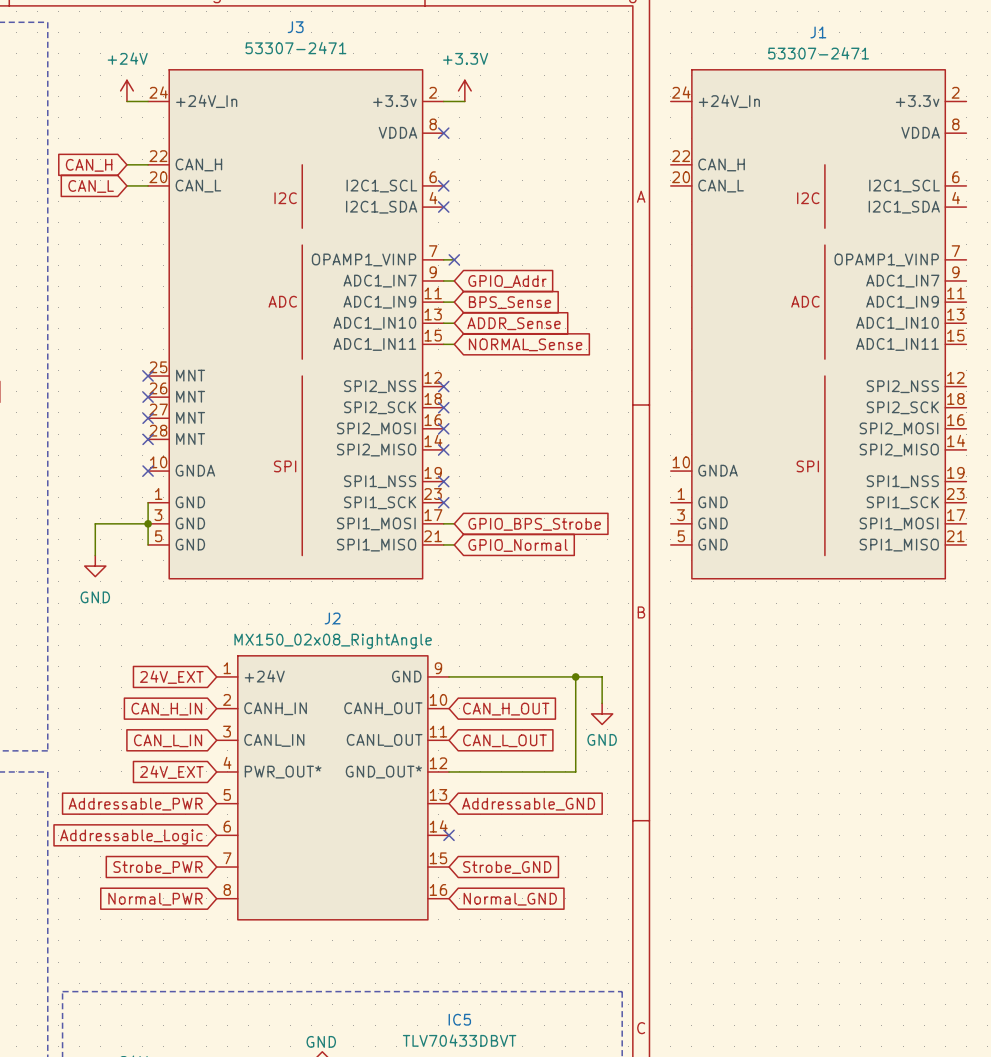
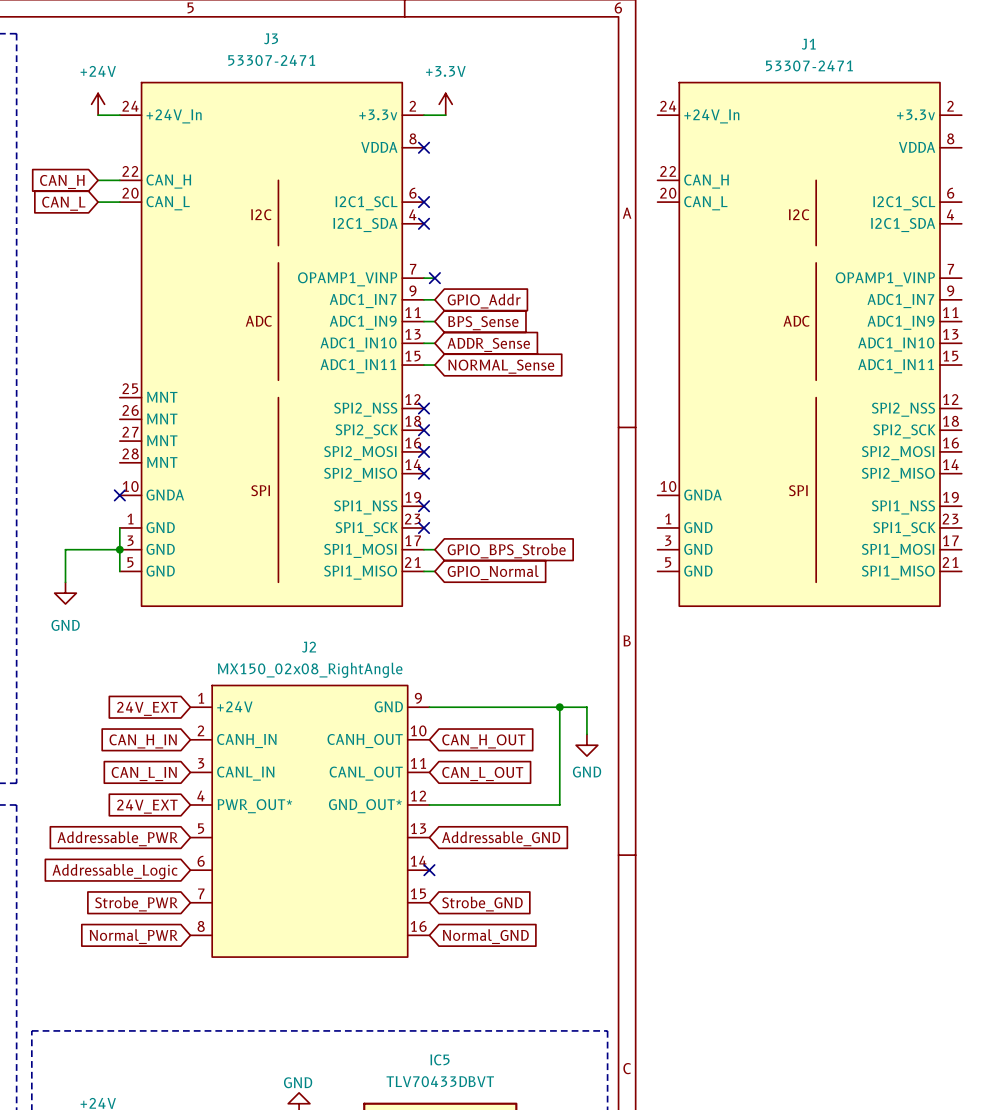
no-connect mark: (148, 376) -> none
no-connect mark: (148, 397) -> none
no-connect mark: (148, 418) -> none
no-connect mark: (148, 439) -> none

